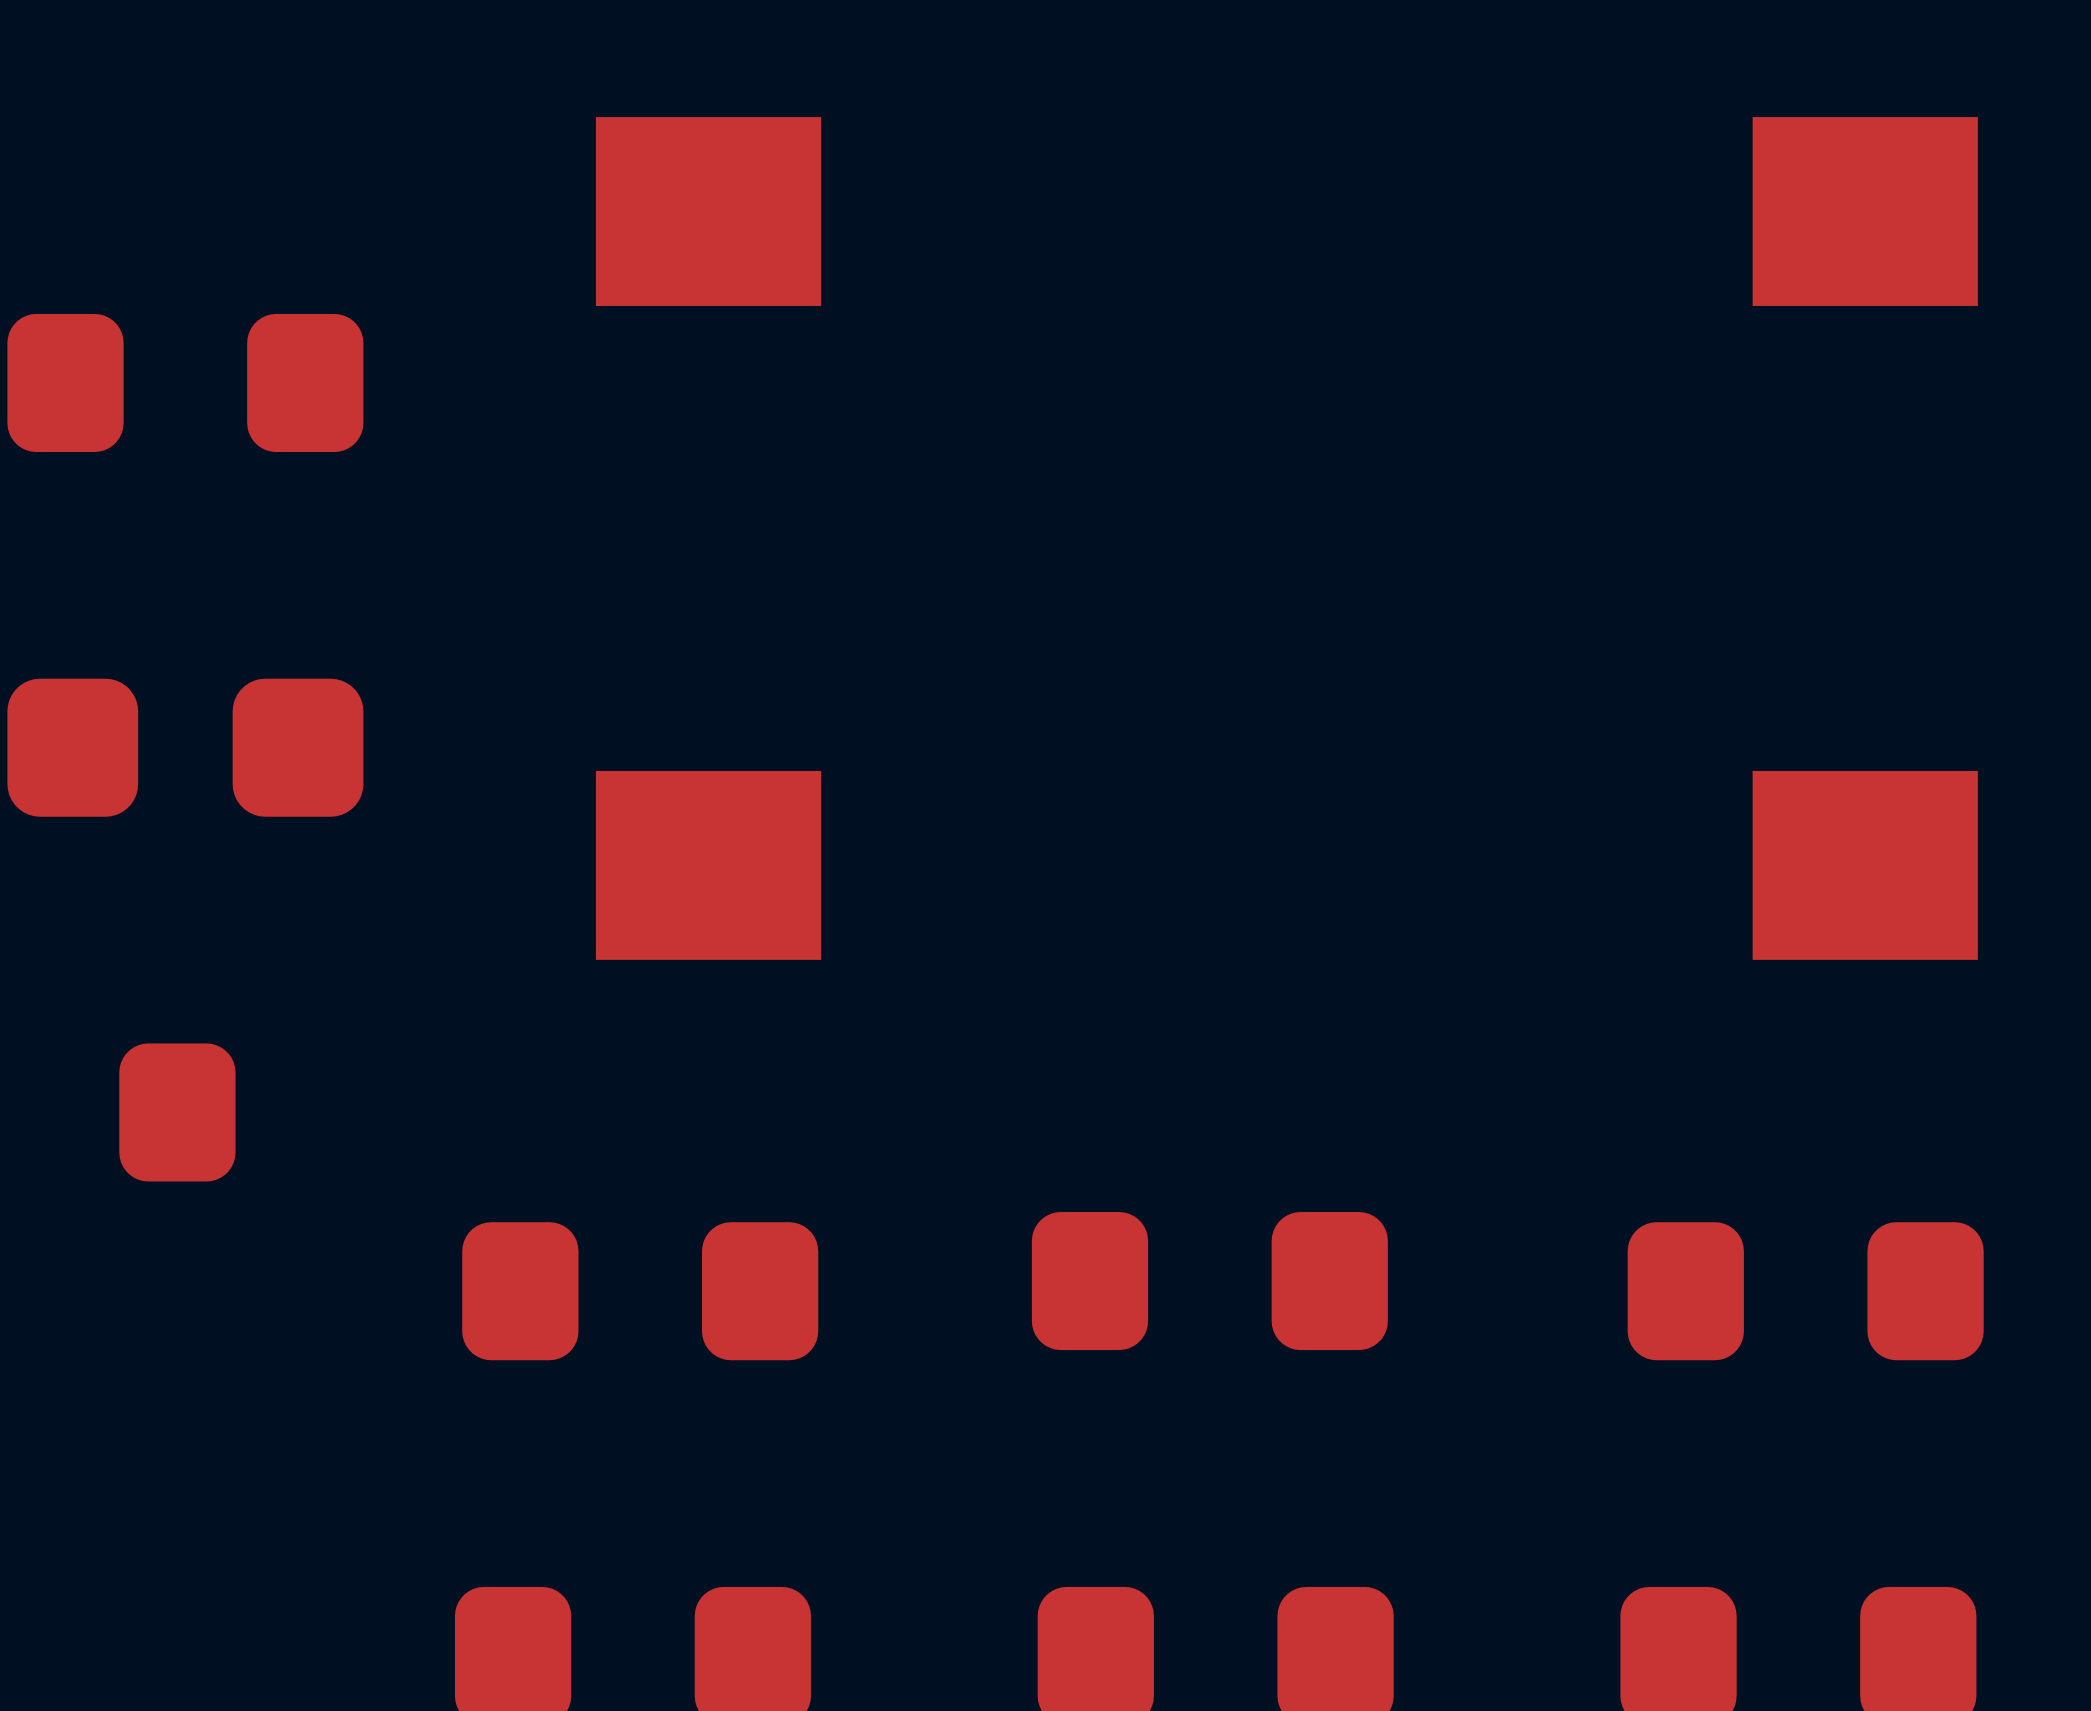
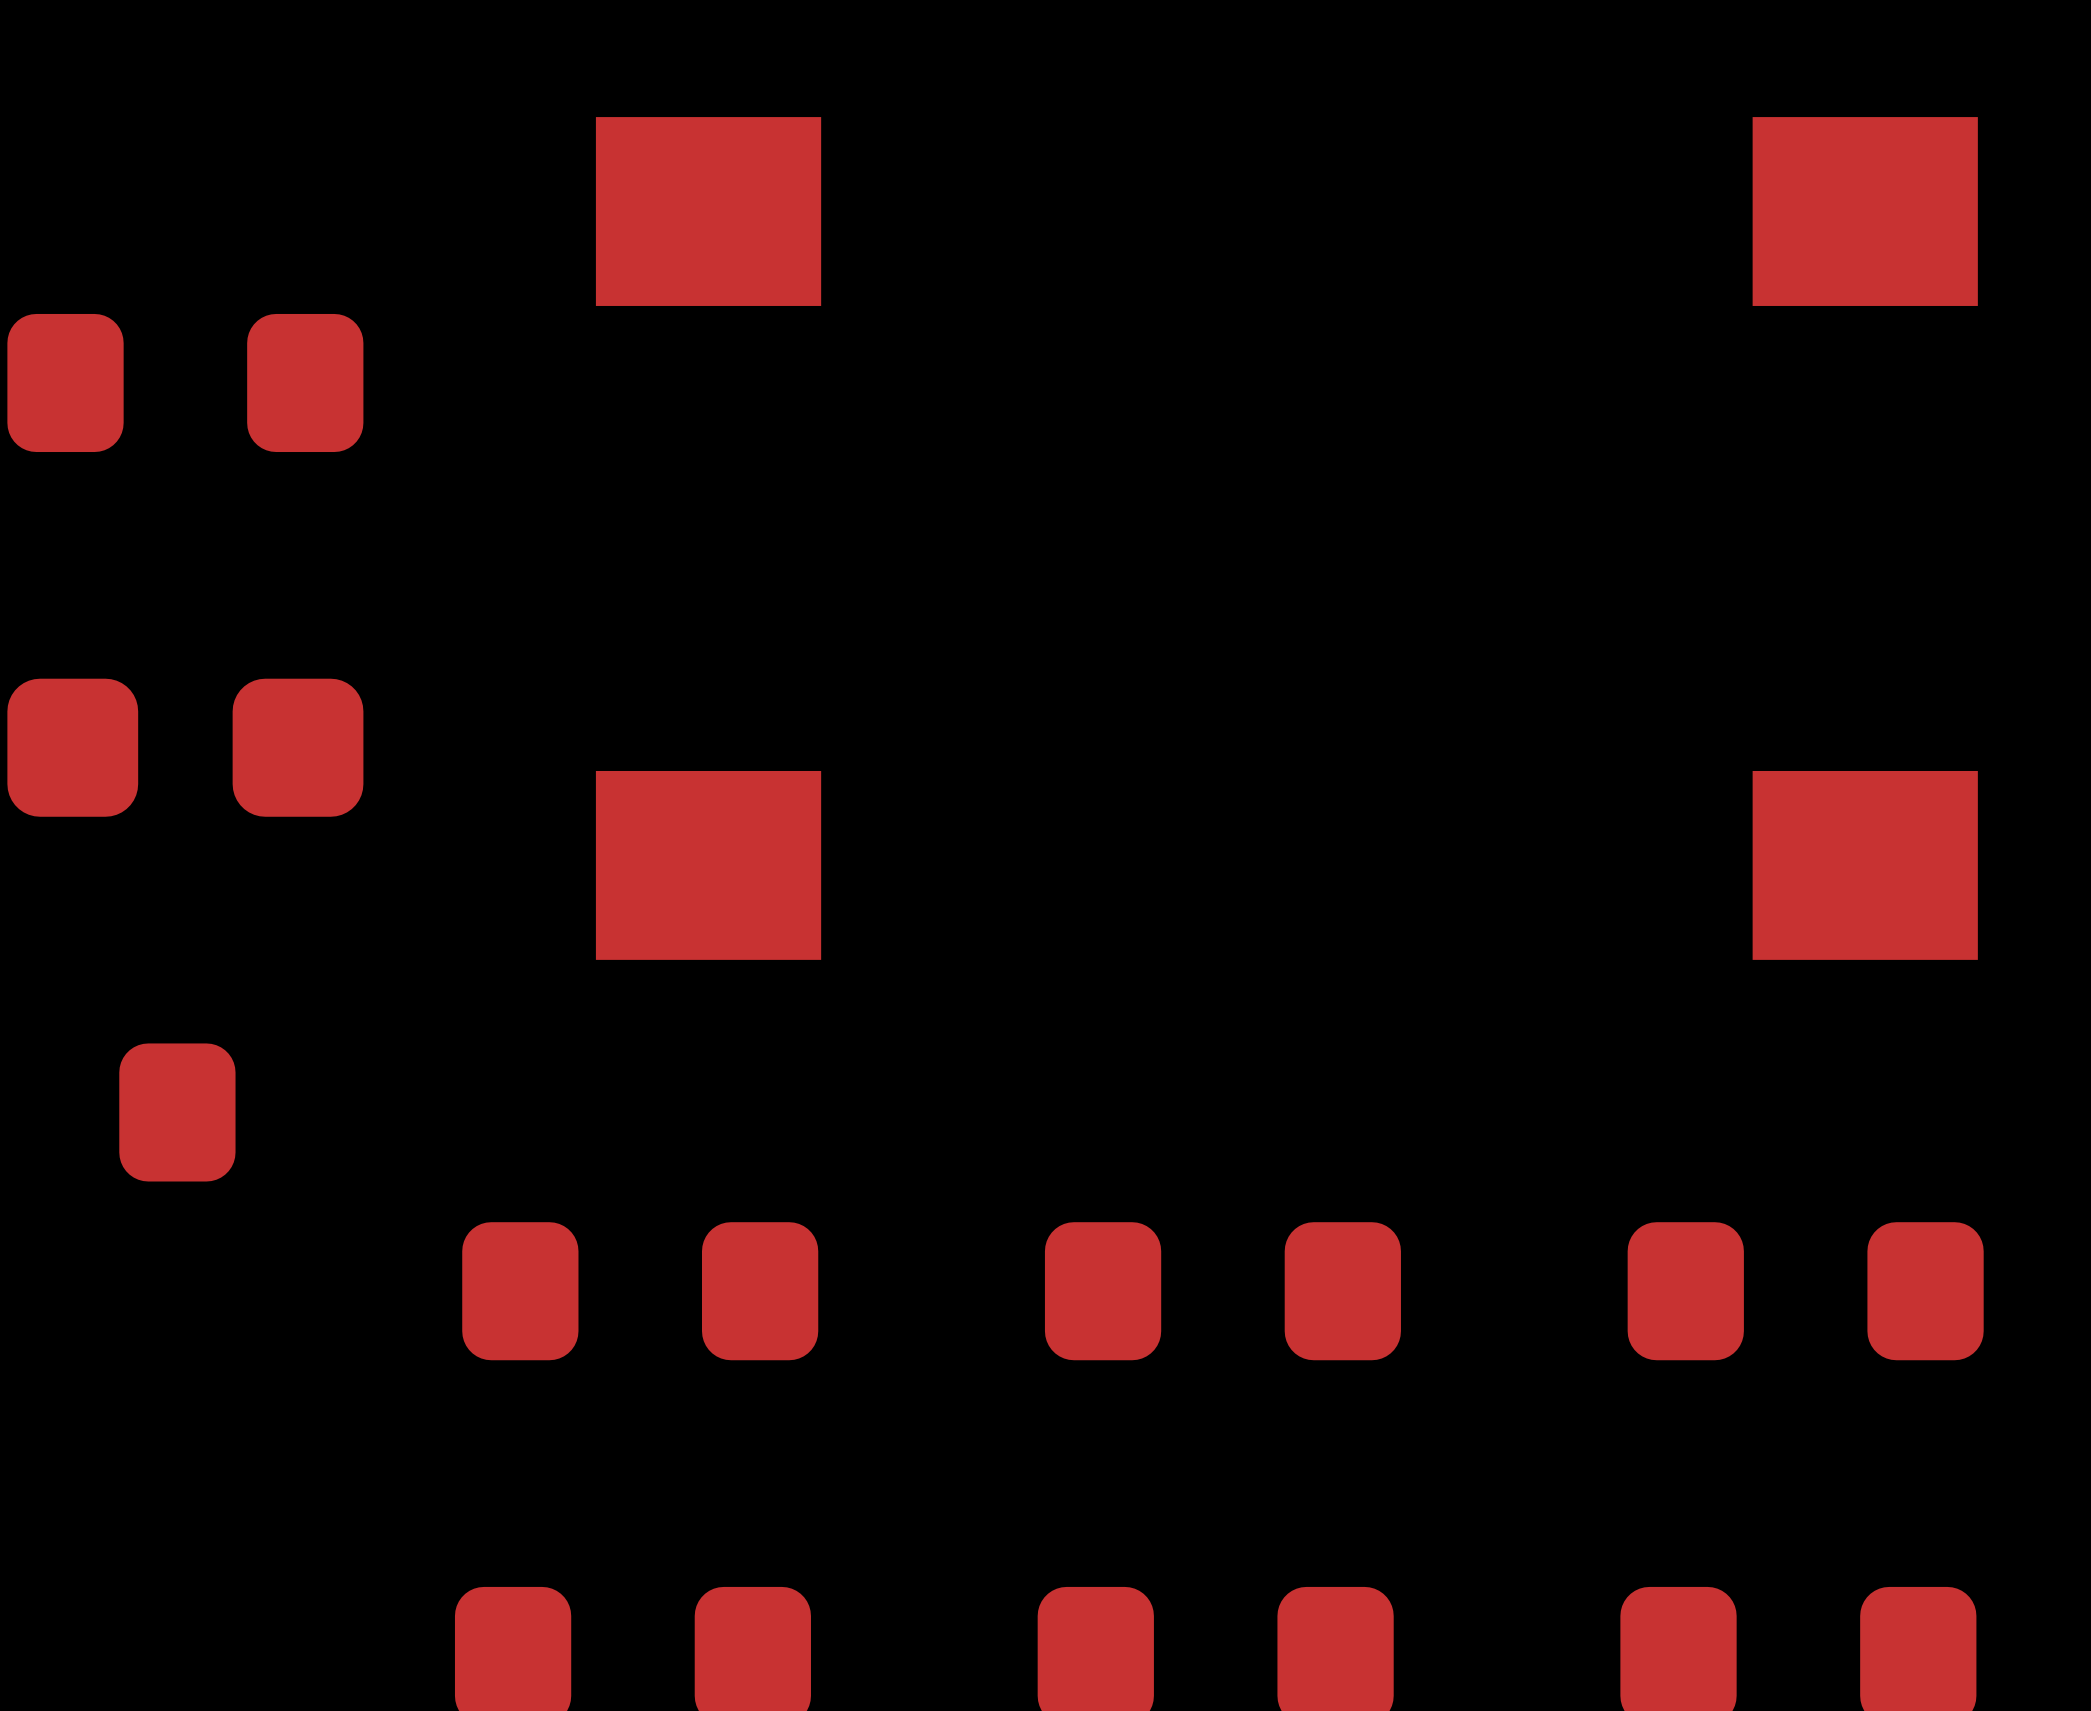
part position: (1209, 1281) -> (1222, 1291)

